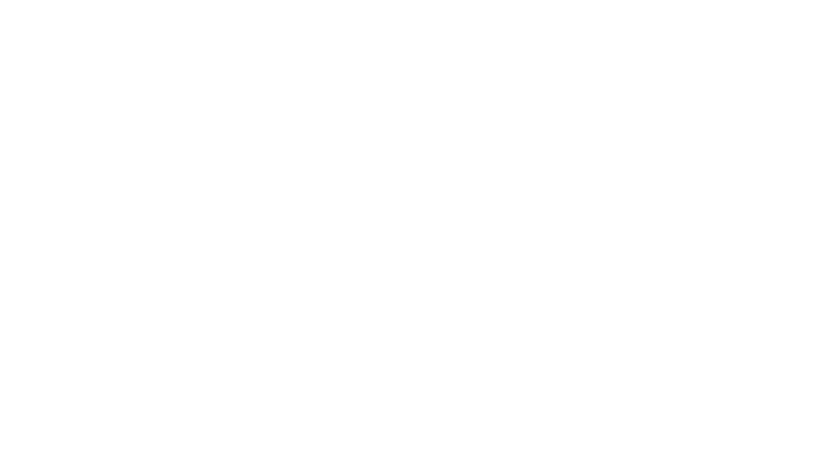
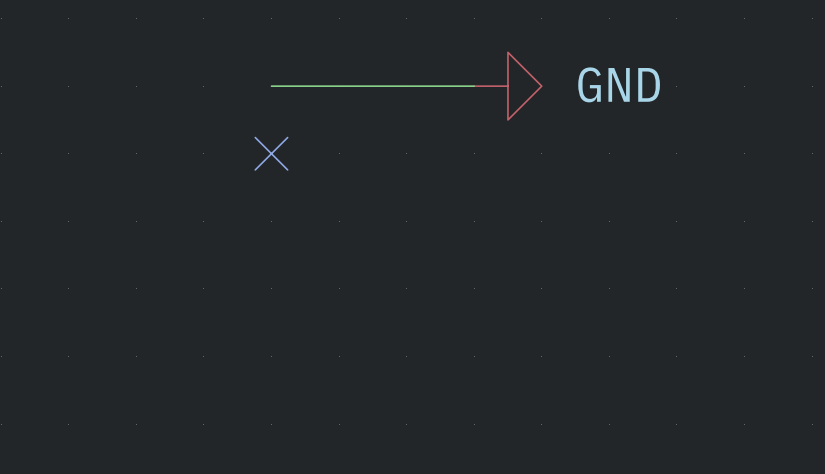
wire: none -> (271, 86) (474, 86)
power symbol: none -> GND (507, 86)
no-connect mark: none -> (271, 153)

